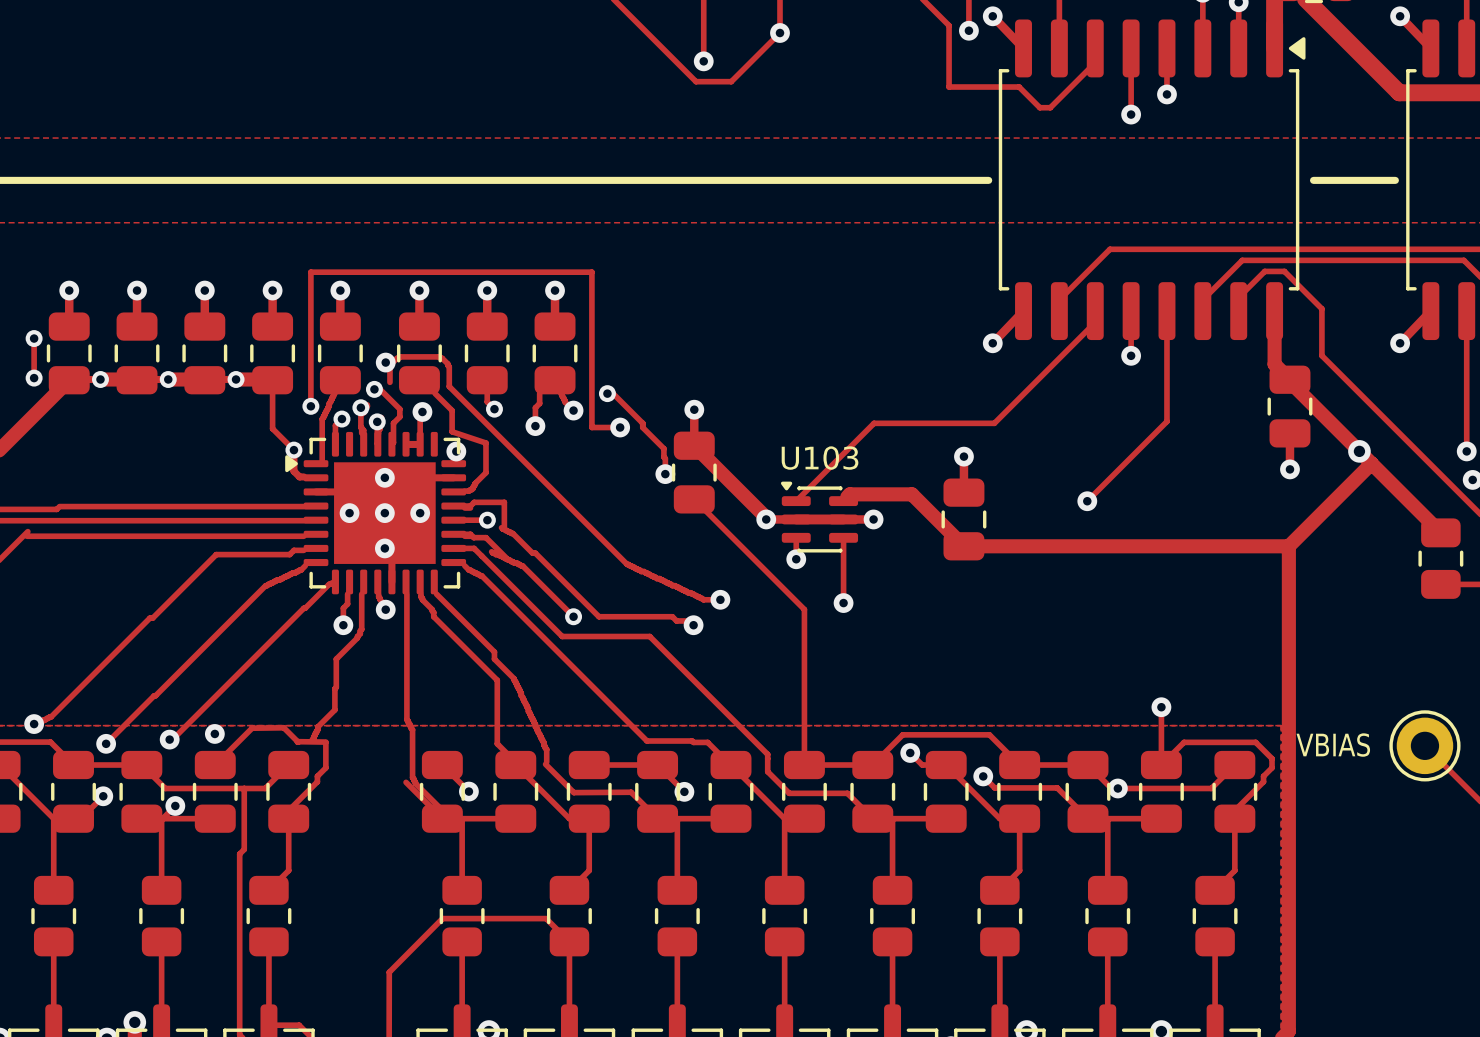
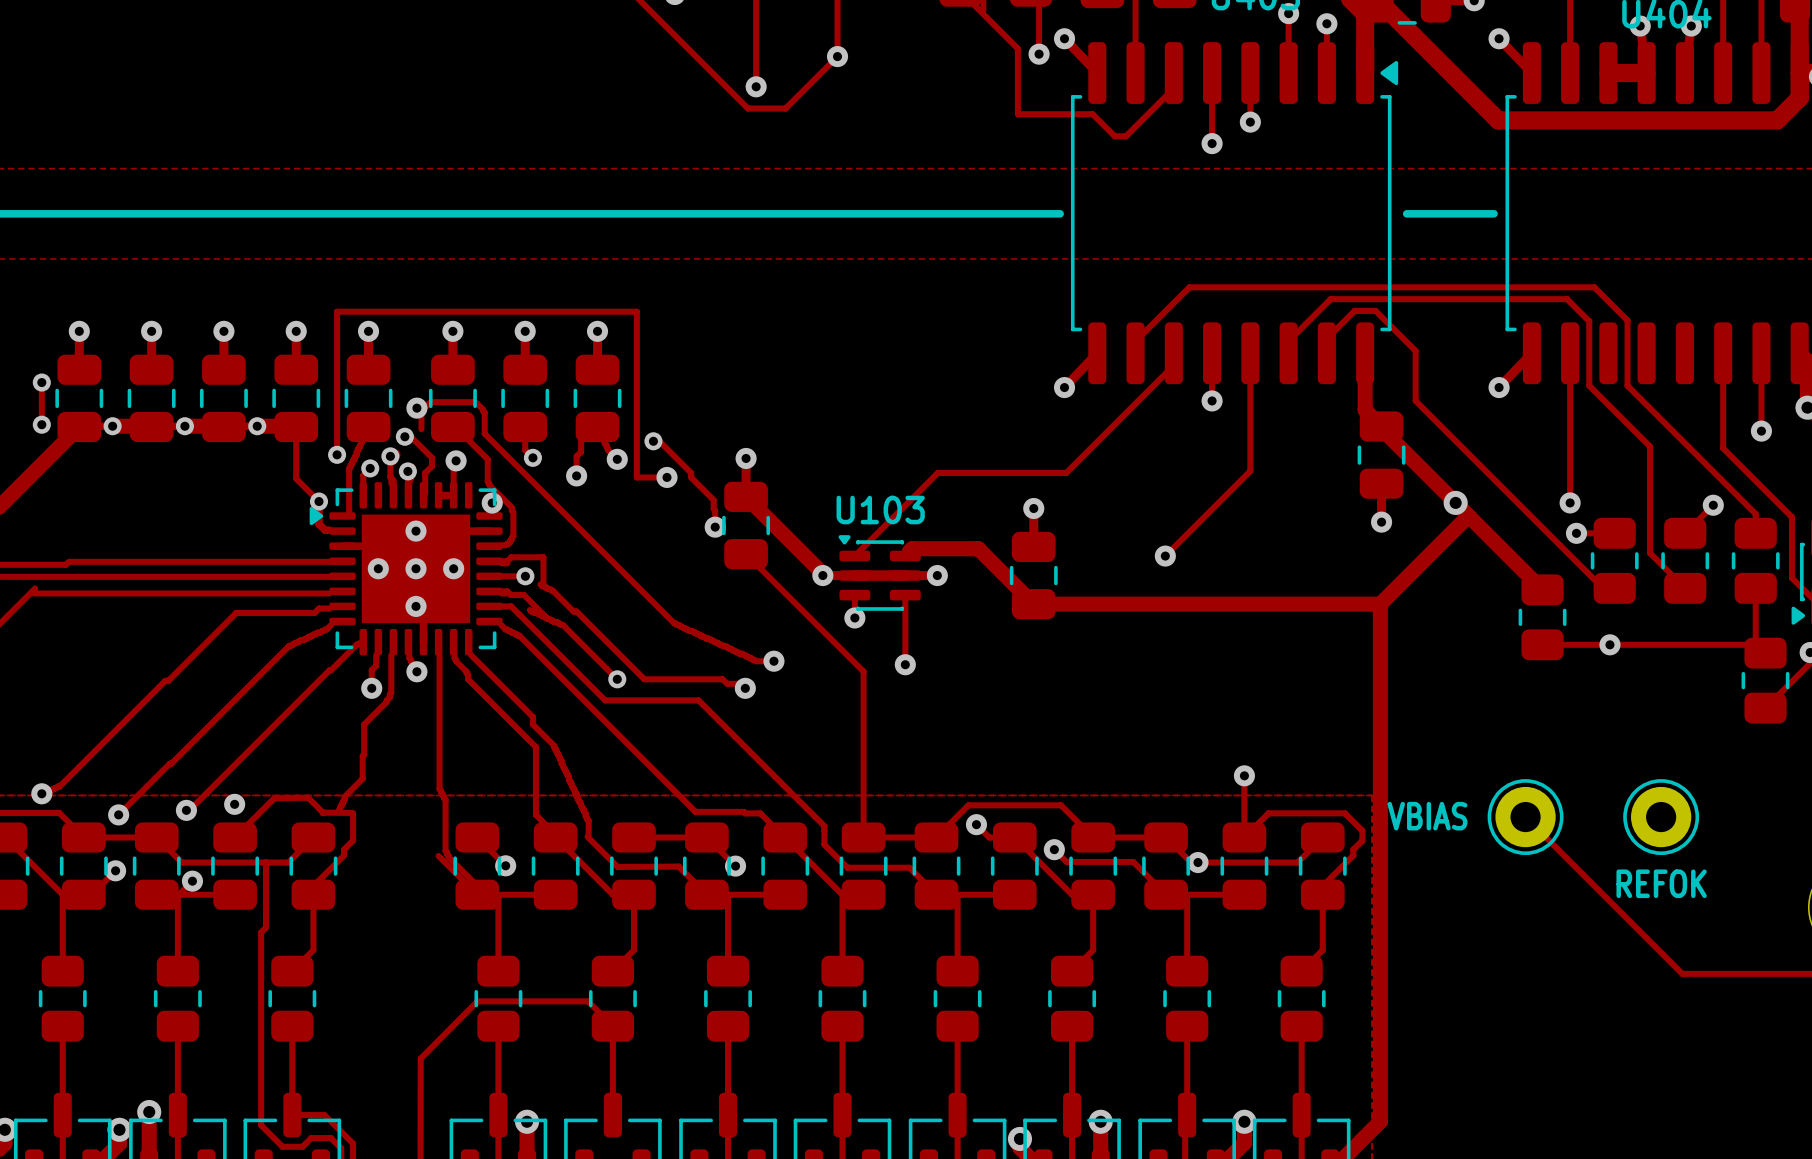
track: (452, 431) (486, 443) (486, 472) (476, 482) -> (487, 481) (511, 507) (513, 536)

